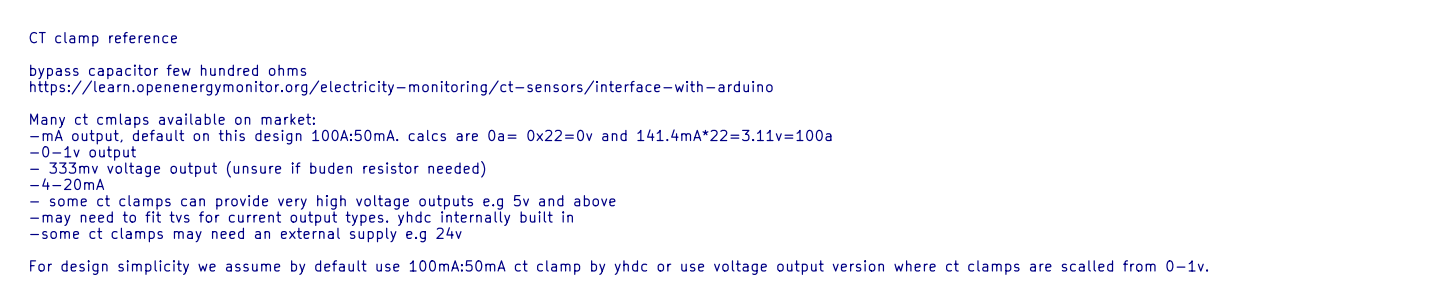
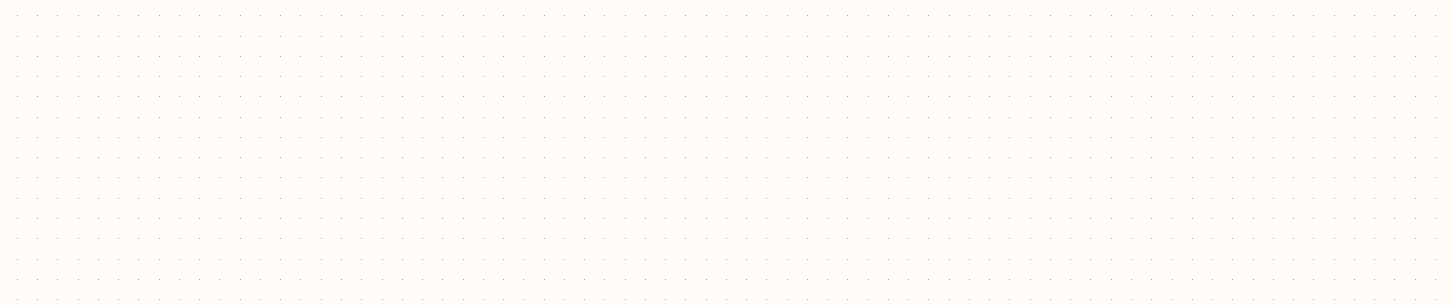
text: CT clamp reference (103, 39) -> none
text: bypass capacitor few hundred ohms (168, 71) -> none
text: https://learn.openenergymonitor.org/electricity-monitoring/ct-sensors/interface-with-arduino (401, 87) -> none
text: Many ct cmlaps available on market: (172, 120) -> none
text: -mA output, default on this design 100A:50mA. calcs are 0a= 0x22=0v and 141.4mA*22=3.11v=100a (430, 136) -> none
text: -0-1v output (83, 153) -> none
text: - 333mv voltage output (unsure if buden resistor needed) (257, 169) -> none
text: -4-20mA (67, 184) -> none
text: - some ct clamps can provide very high voltage outputs e.g 5v and above (322, 202) -> none
text: -may need to fit tvs for current output types. yhdc internally built in (301, 218) -> none
text: -some ct clamps may need an external supply e.g 24v (245, 234) -> none
text: For design simplicity we assume by default use 100mA:50mA ct clamp by yhdc or use voltage output version where ct clamps are scalled from 0-1v. (619, 267) -> none

